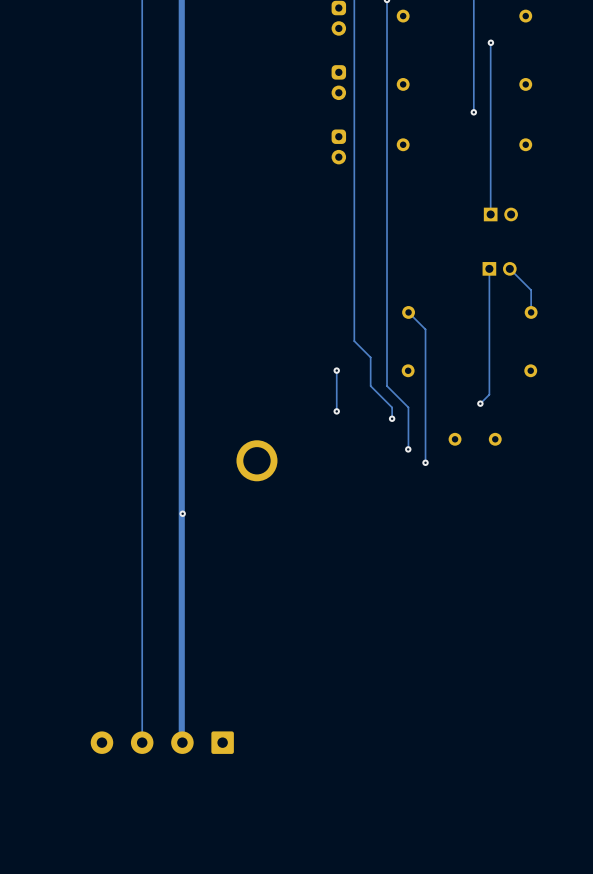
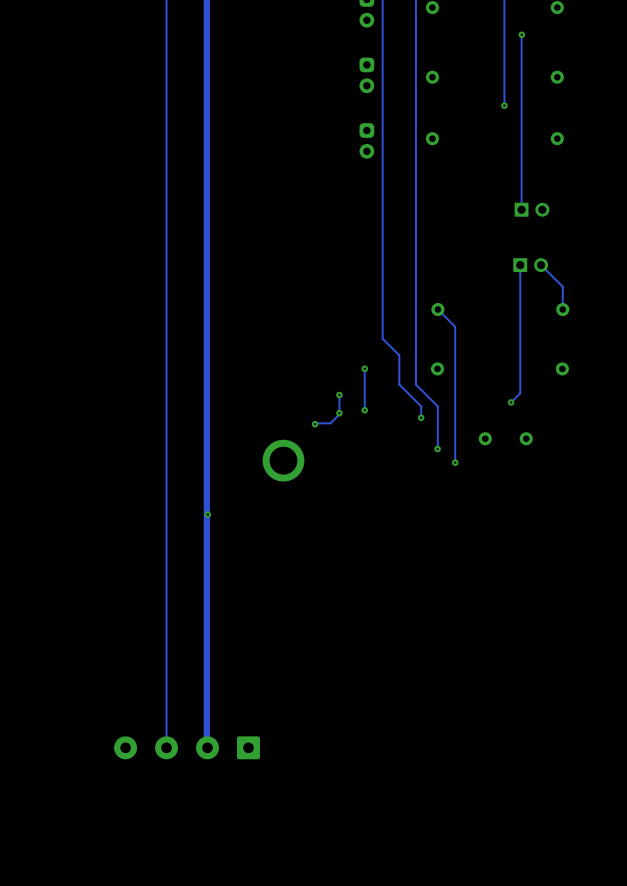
track: none -> (339, 395) (339, 414) (330, 423) (315, 424)
via: none -> (339, 395)
via: none -> (339, 413)
via: none -> (315, 424)

